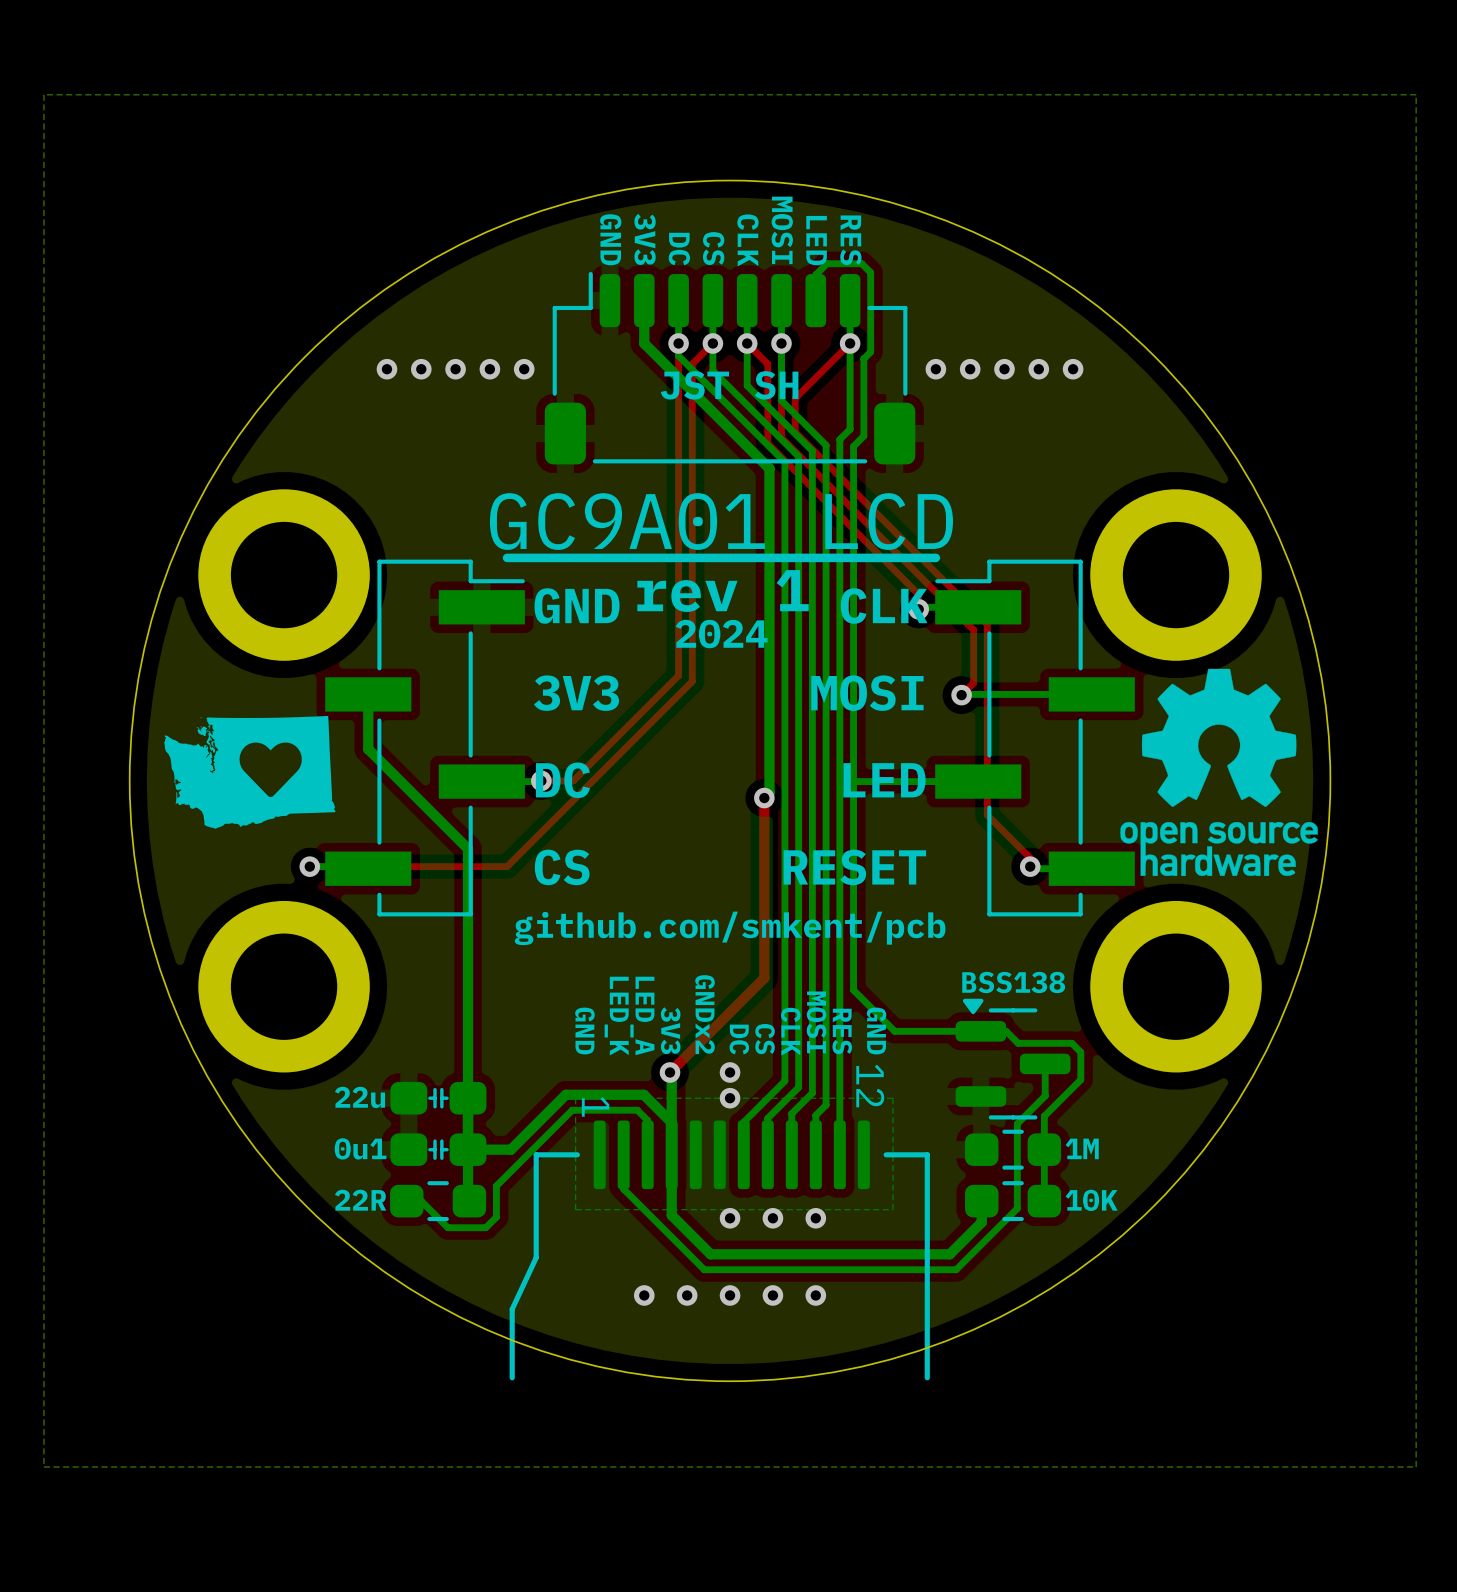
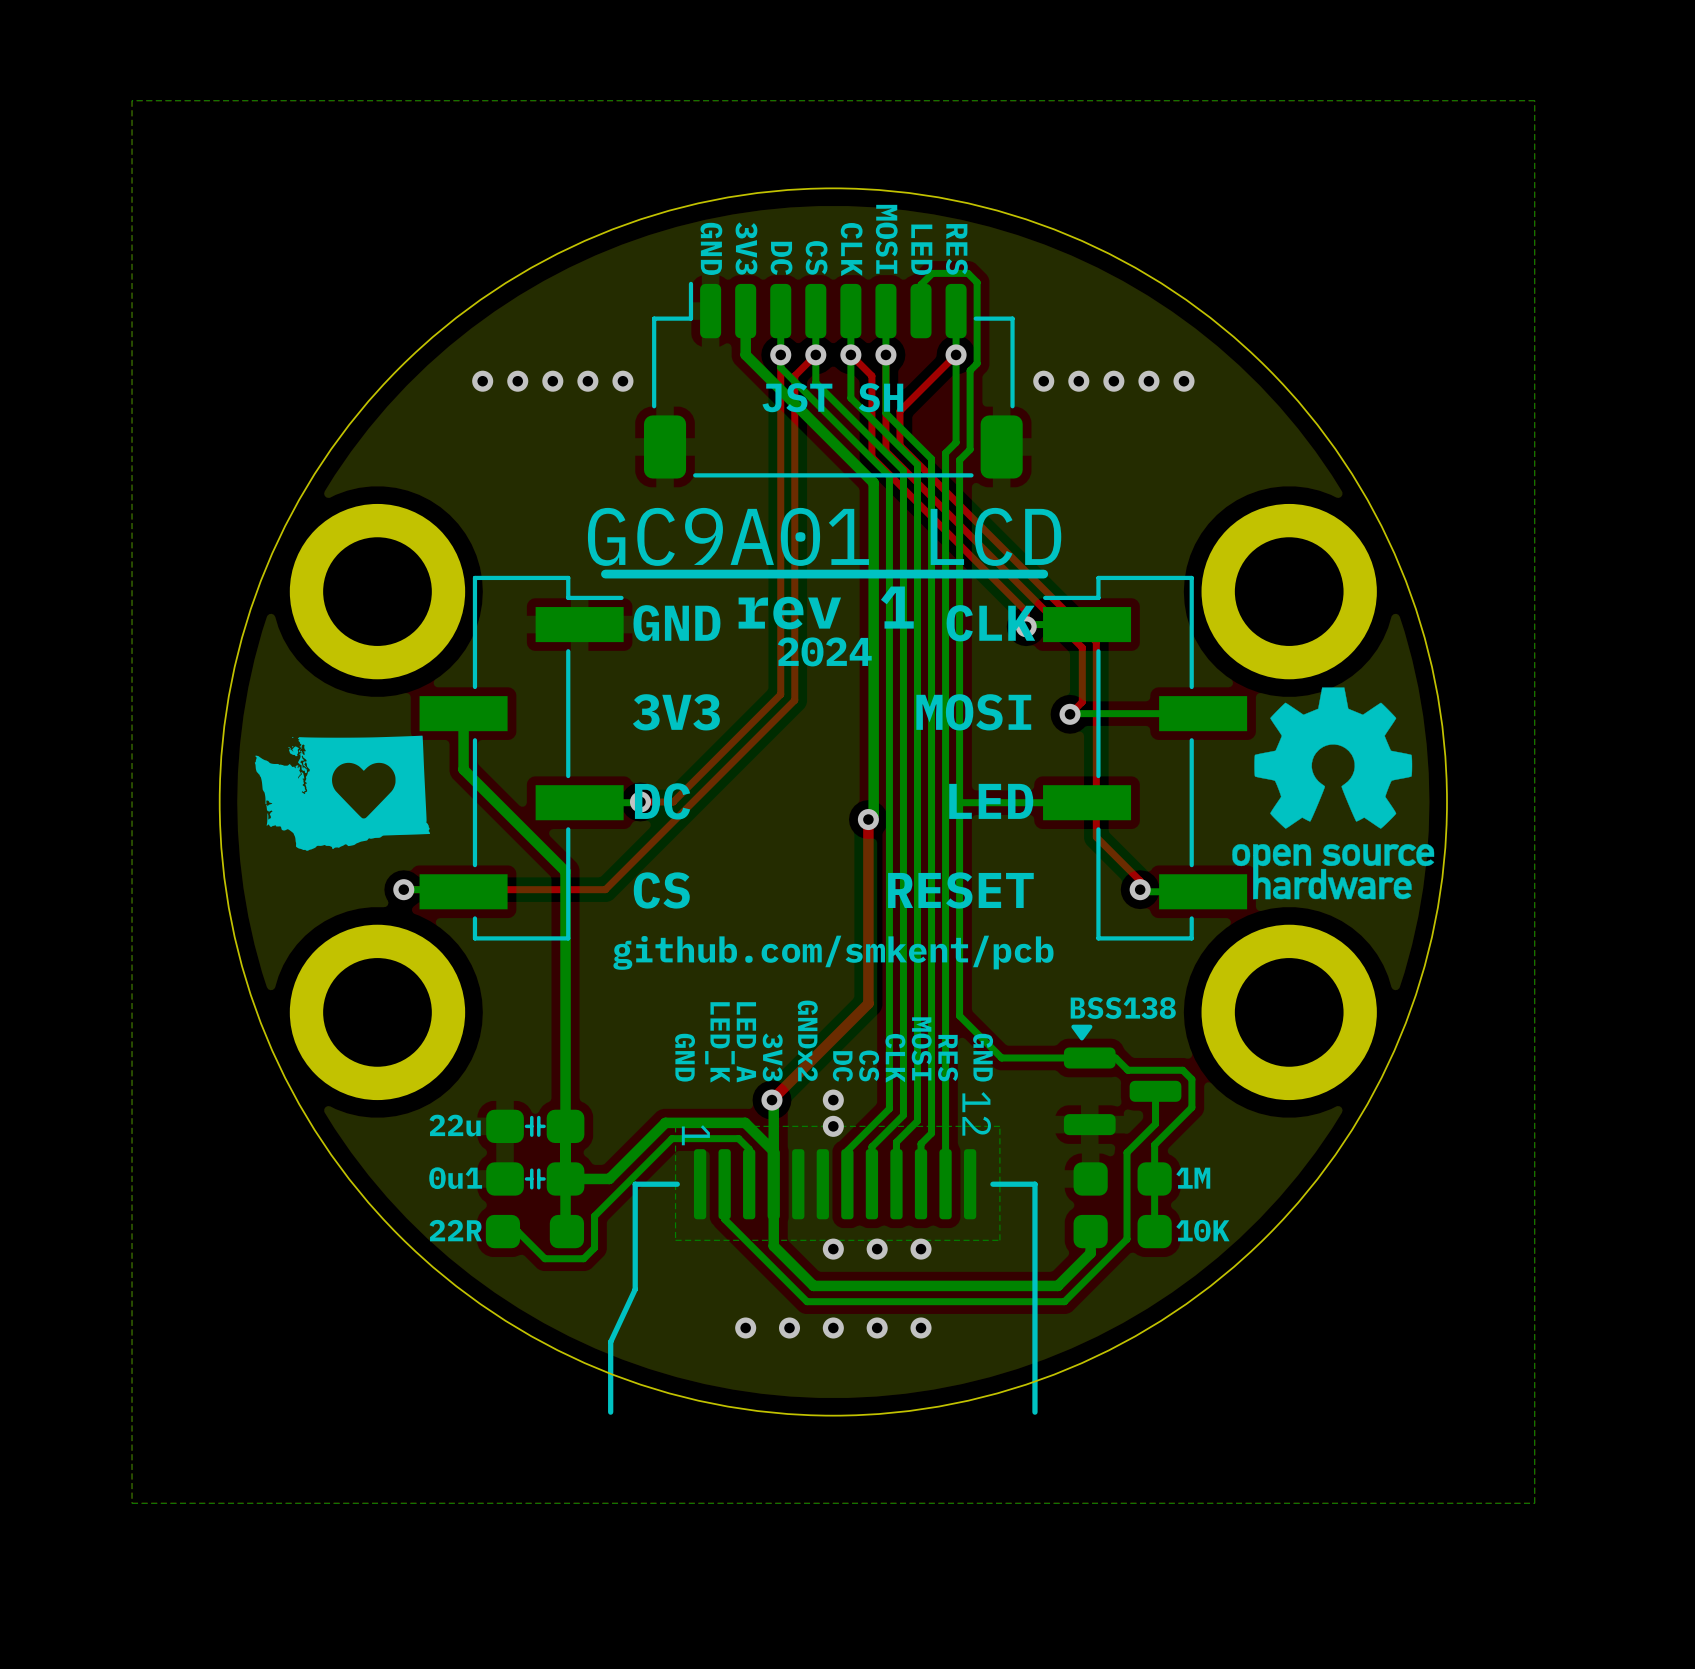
part footprint: [955, 998, 1071, 1120] -> [1063, 1024, 1182, 1136]
part footprint: [965, 1129, 1062, 1170] -> [1073, 1162, 1172, 1196]
part footprint: [390, 1181, 487, 1222] -> [485, 1214, 585, 1249]
part footprint: [965, 1181, 1062, 1222] -> [1073, 1214, 1172, 1249]

